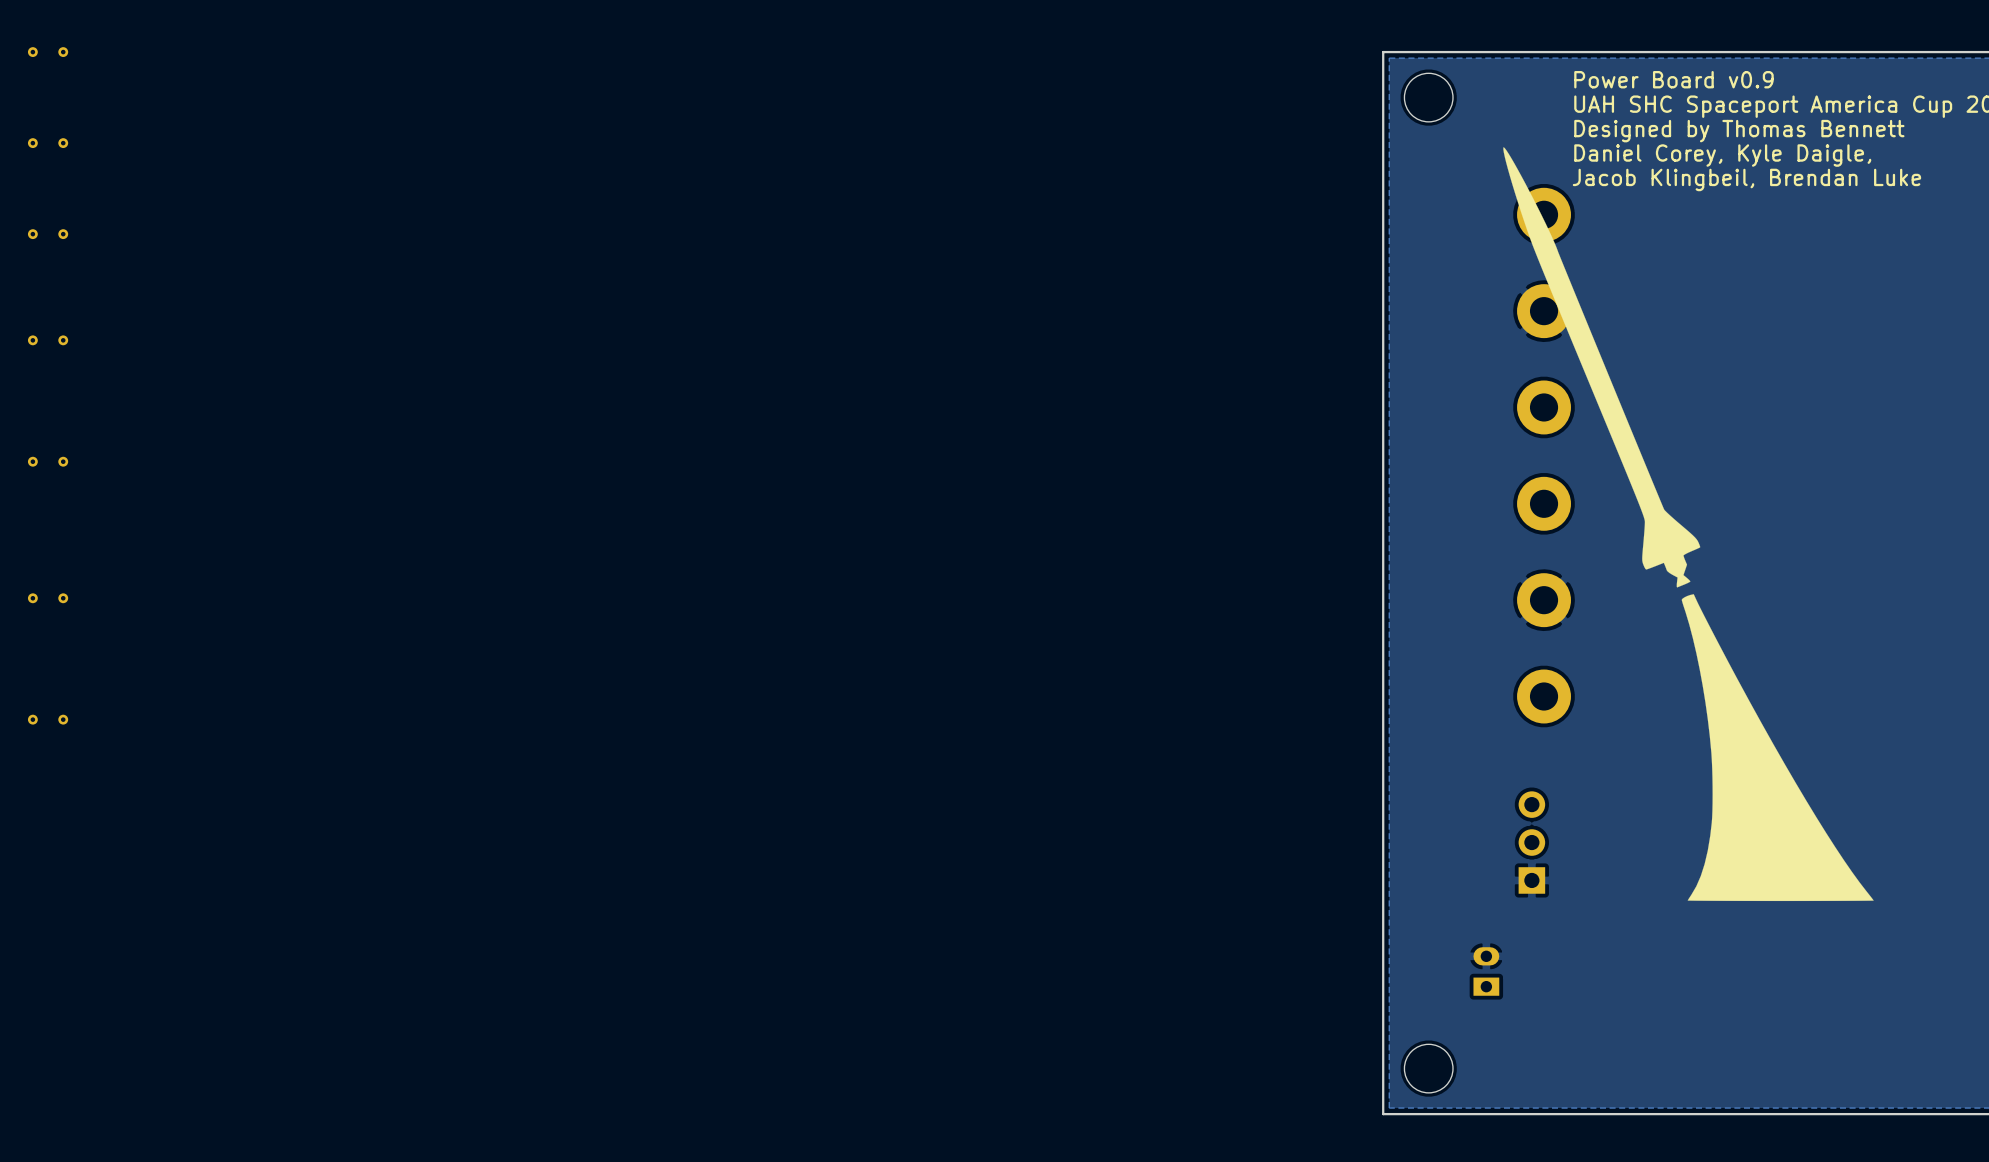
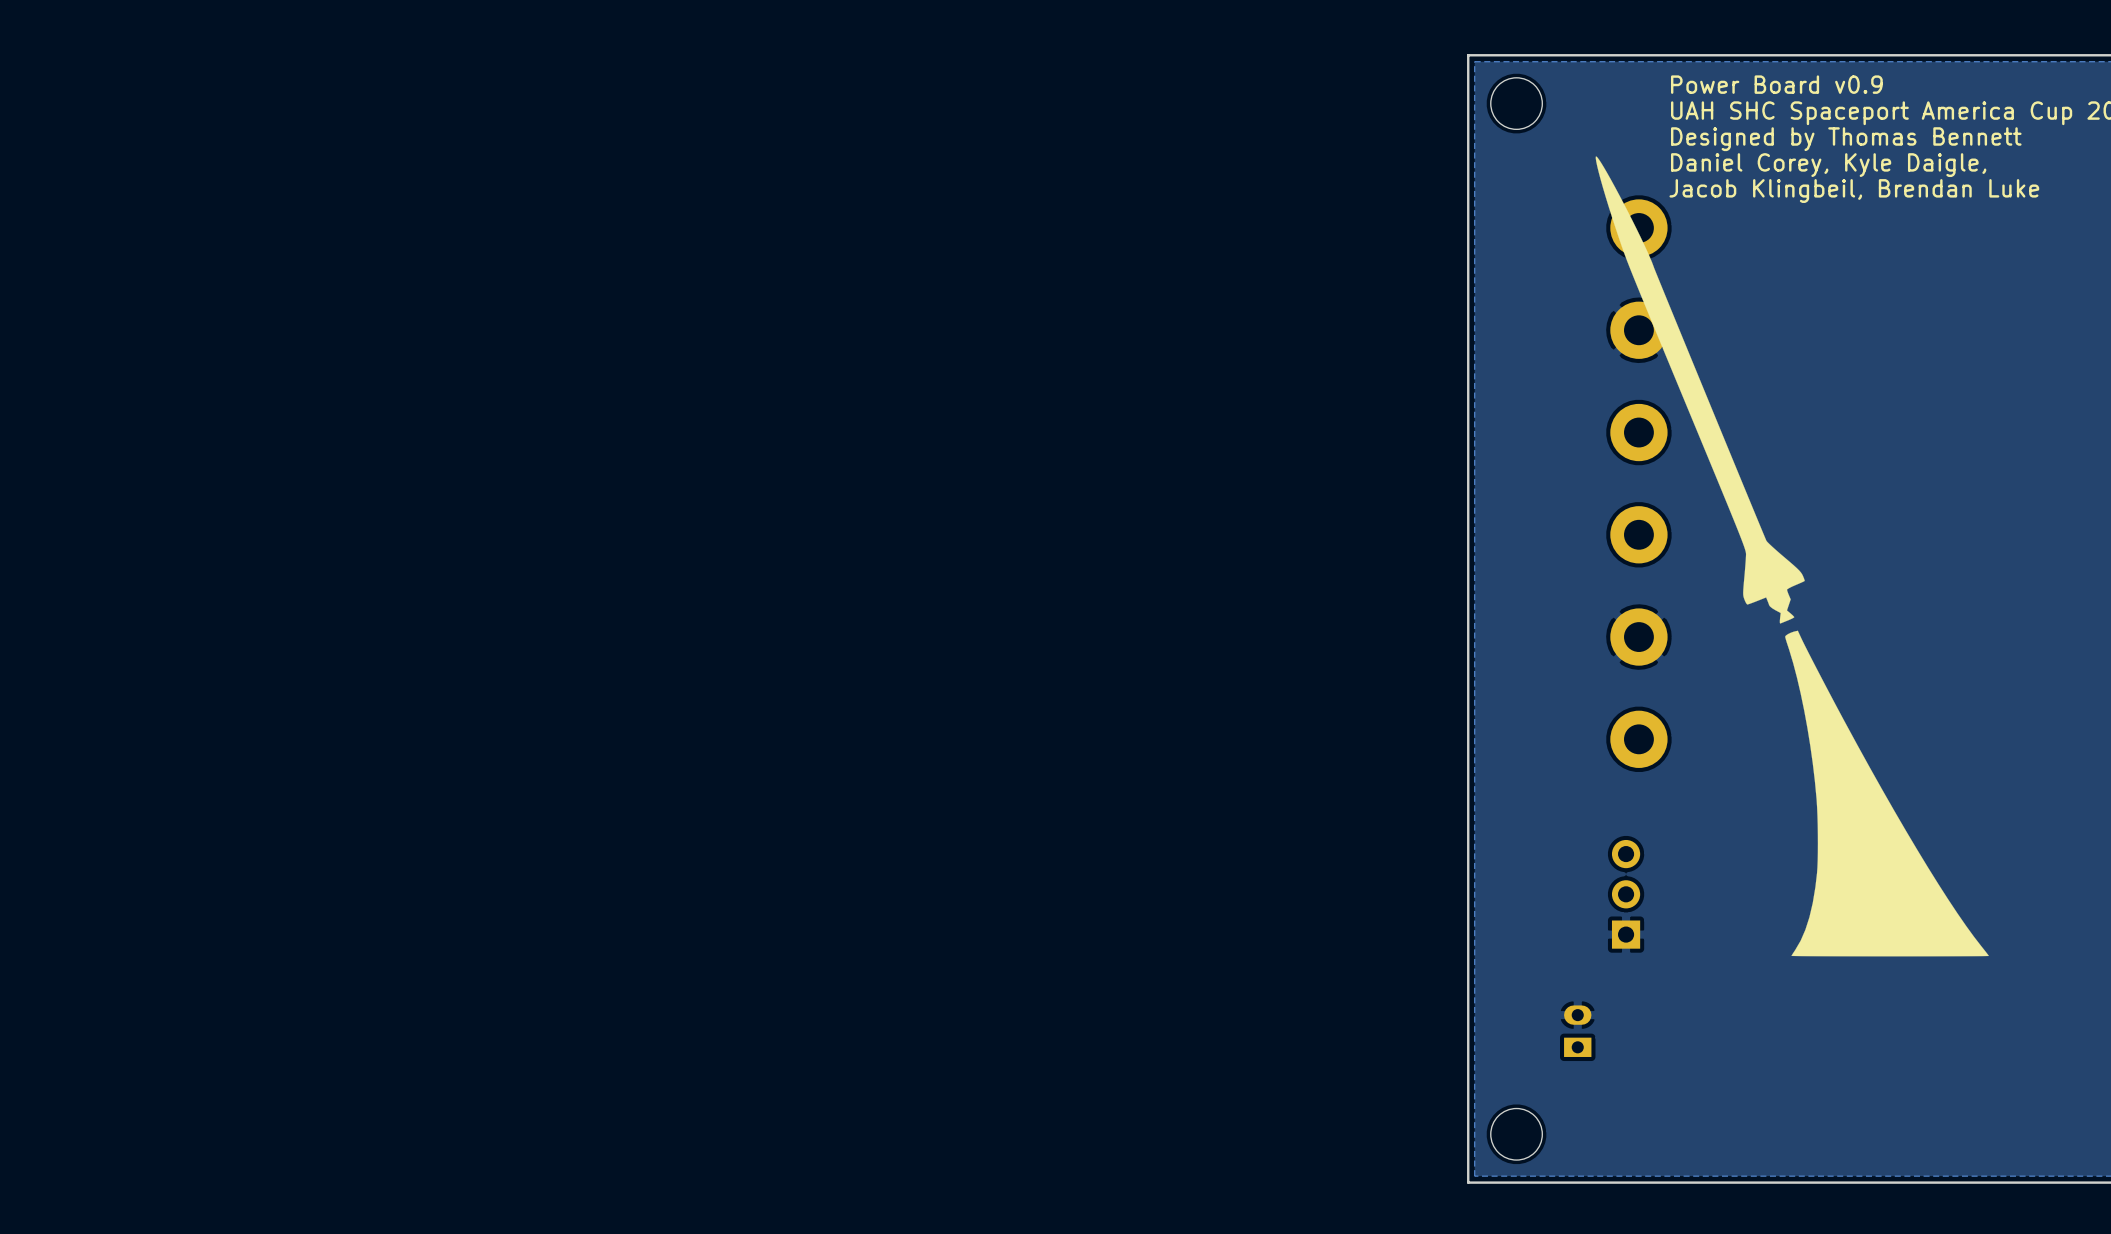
part: (48, 52) -> none
part: (48, 143) -> none
part: (48, 234) -> none
part: (48, 340) -> none
part: (48, 461) -> none
part: (48, 598) -> none
part: (48, 719) -> none

